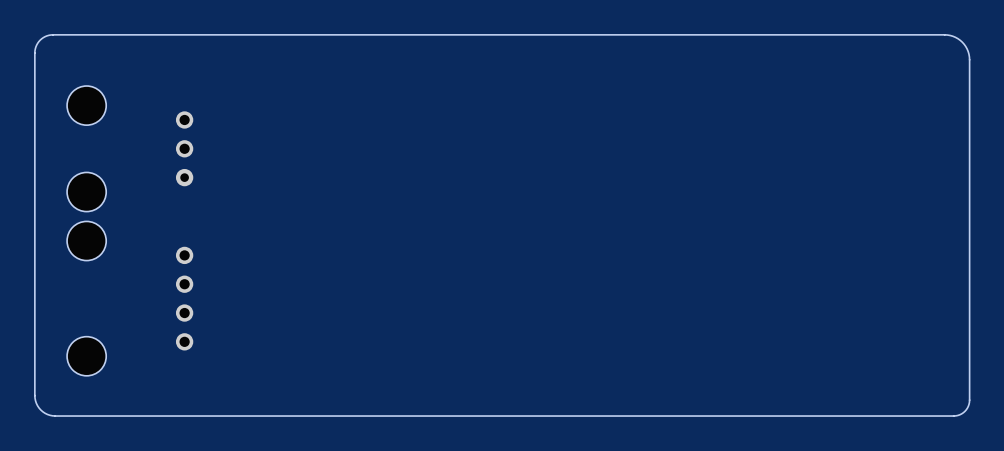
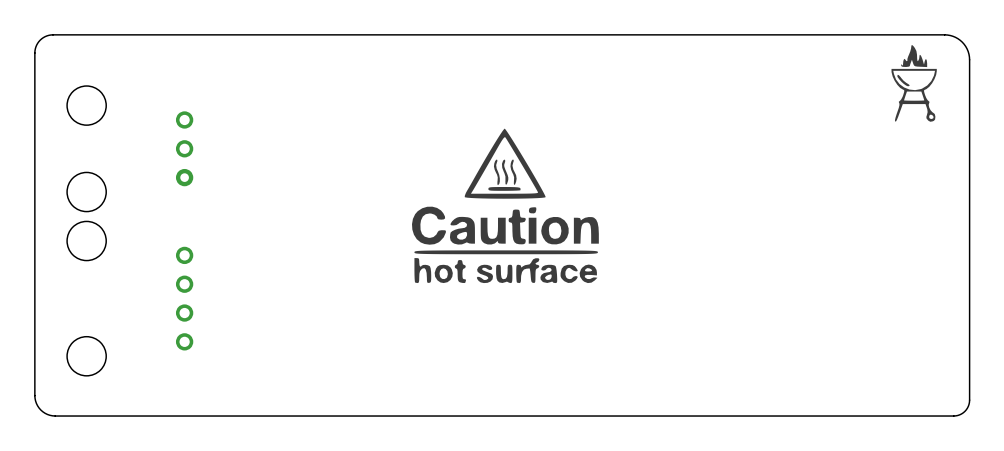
drawing: none -> [891, 45, 937, 122]
drawing: none -> [412, 128, 599, 284]

